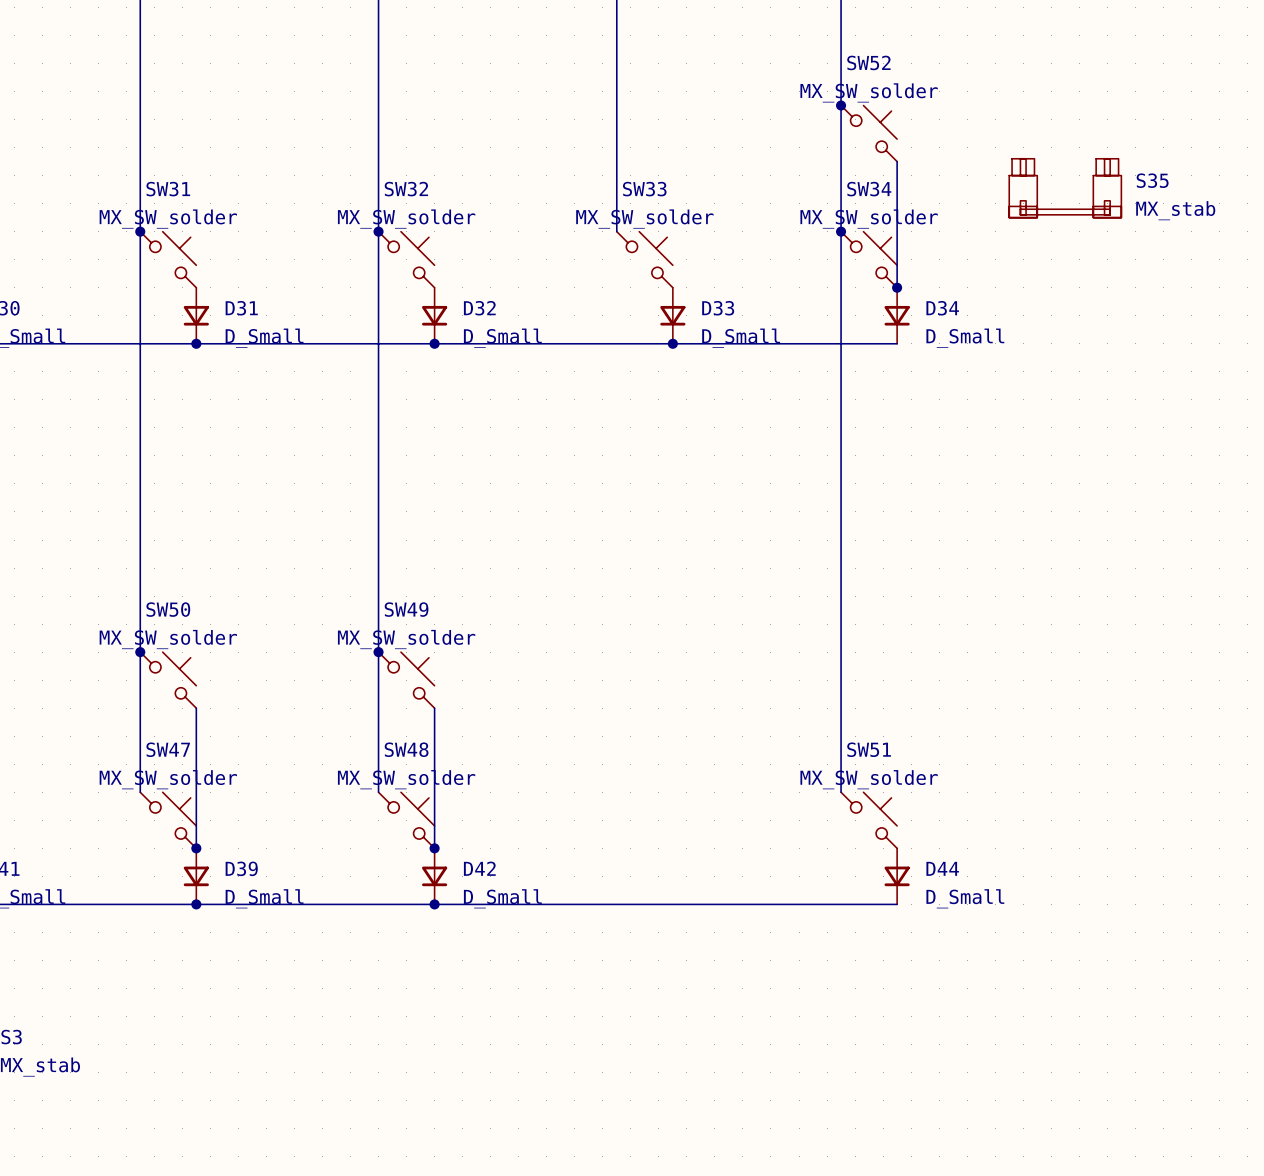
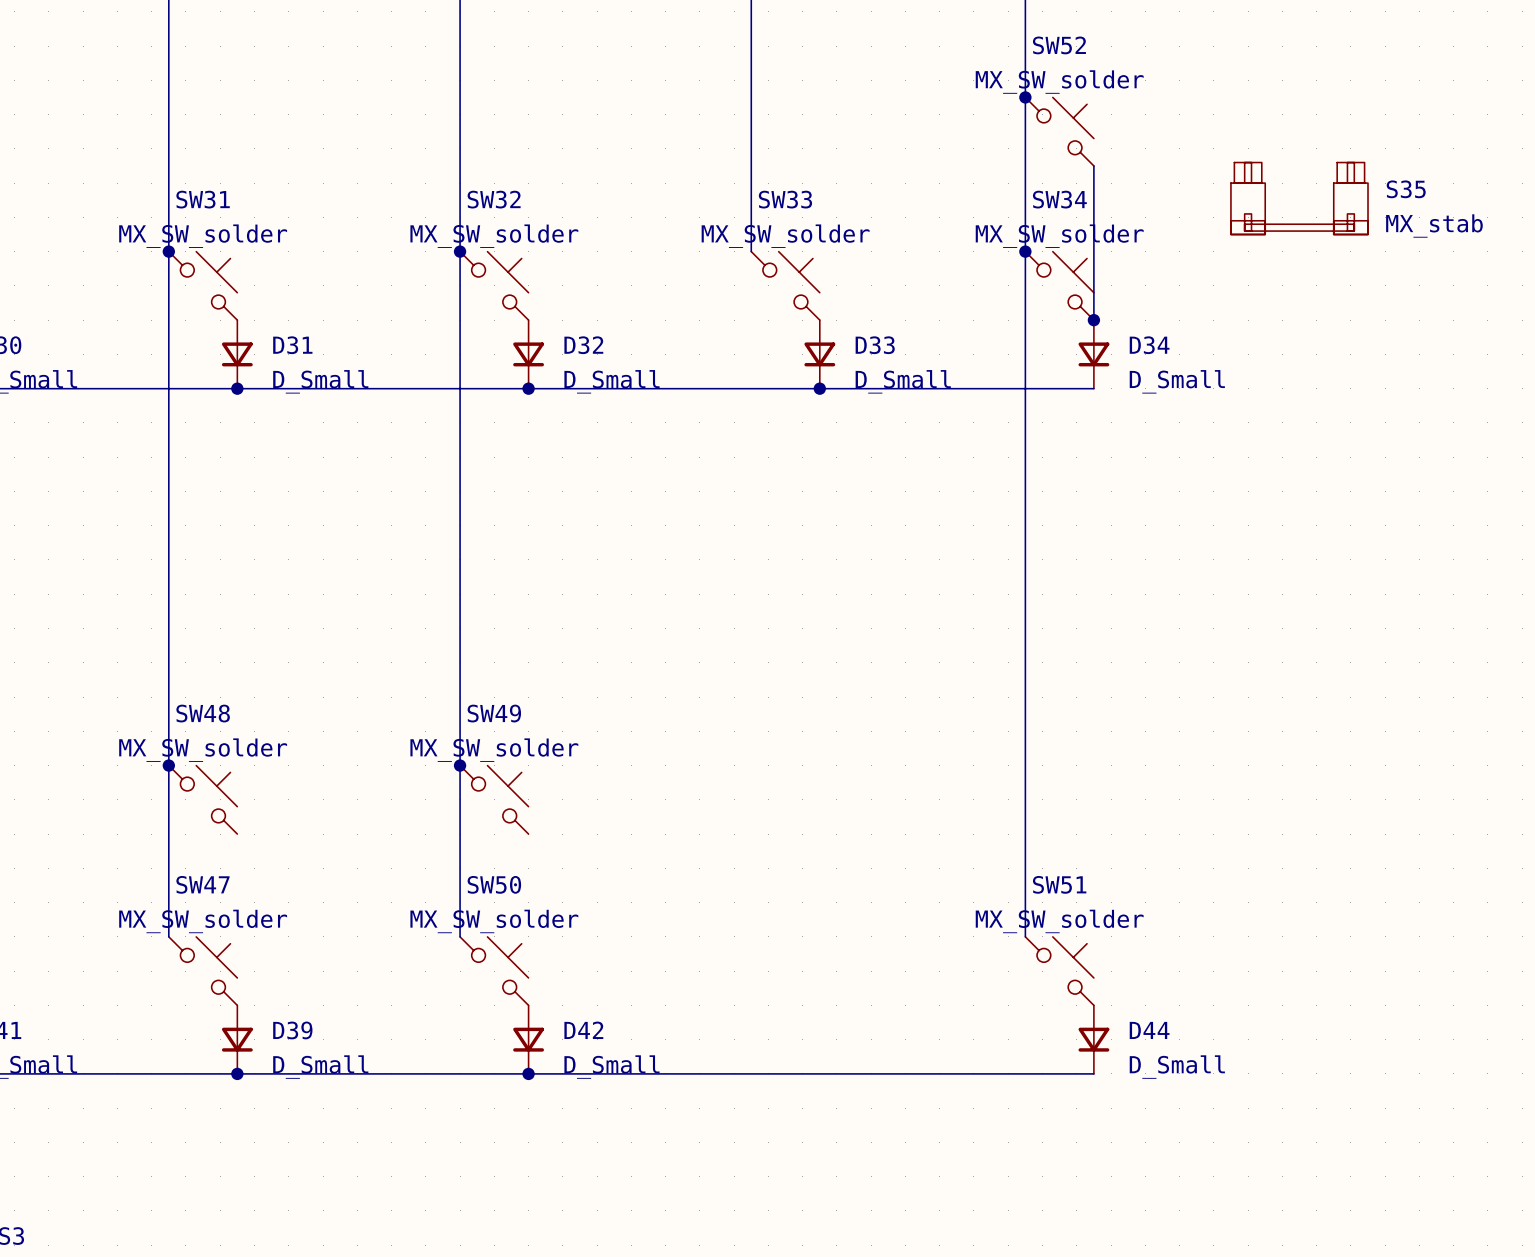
SW50 name: SW50 (168, 609) -> SW48 (203, 713)
wire: (196, 708) (196, 848) -> none
wire: (434, 708) (434, 848) -> none
SW48 name: SW48 (406, 749) -> SW50 (494, 884)
junction: (196, 848) -> none
junction: (434, 848) -> none

